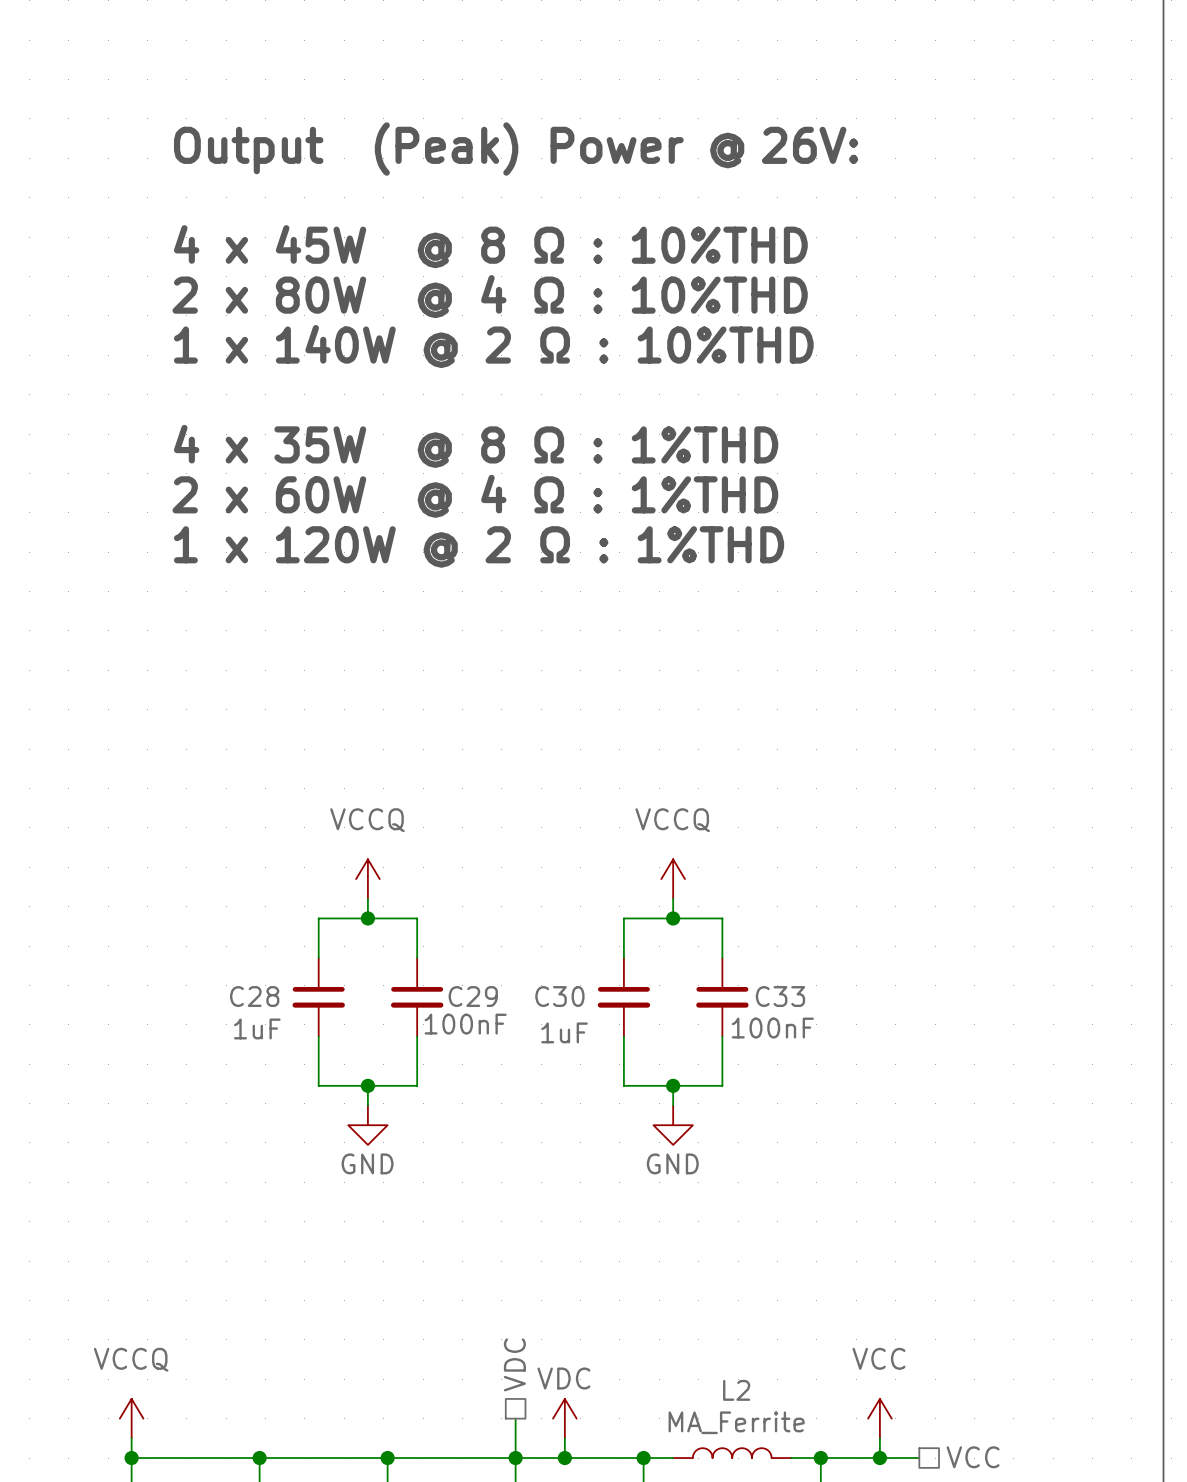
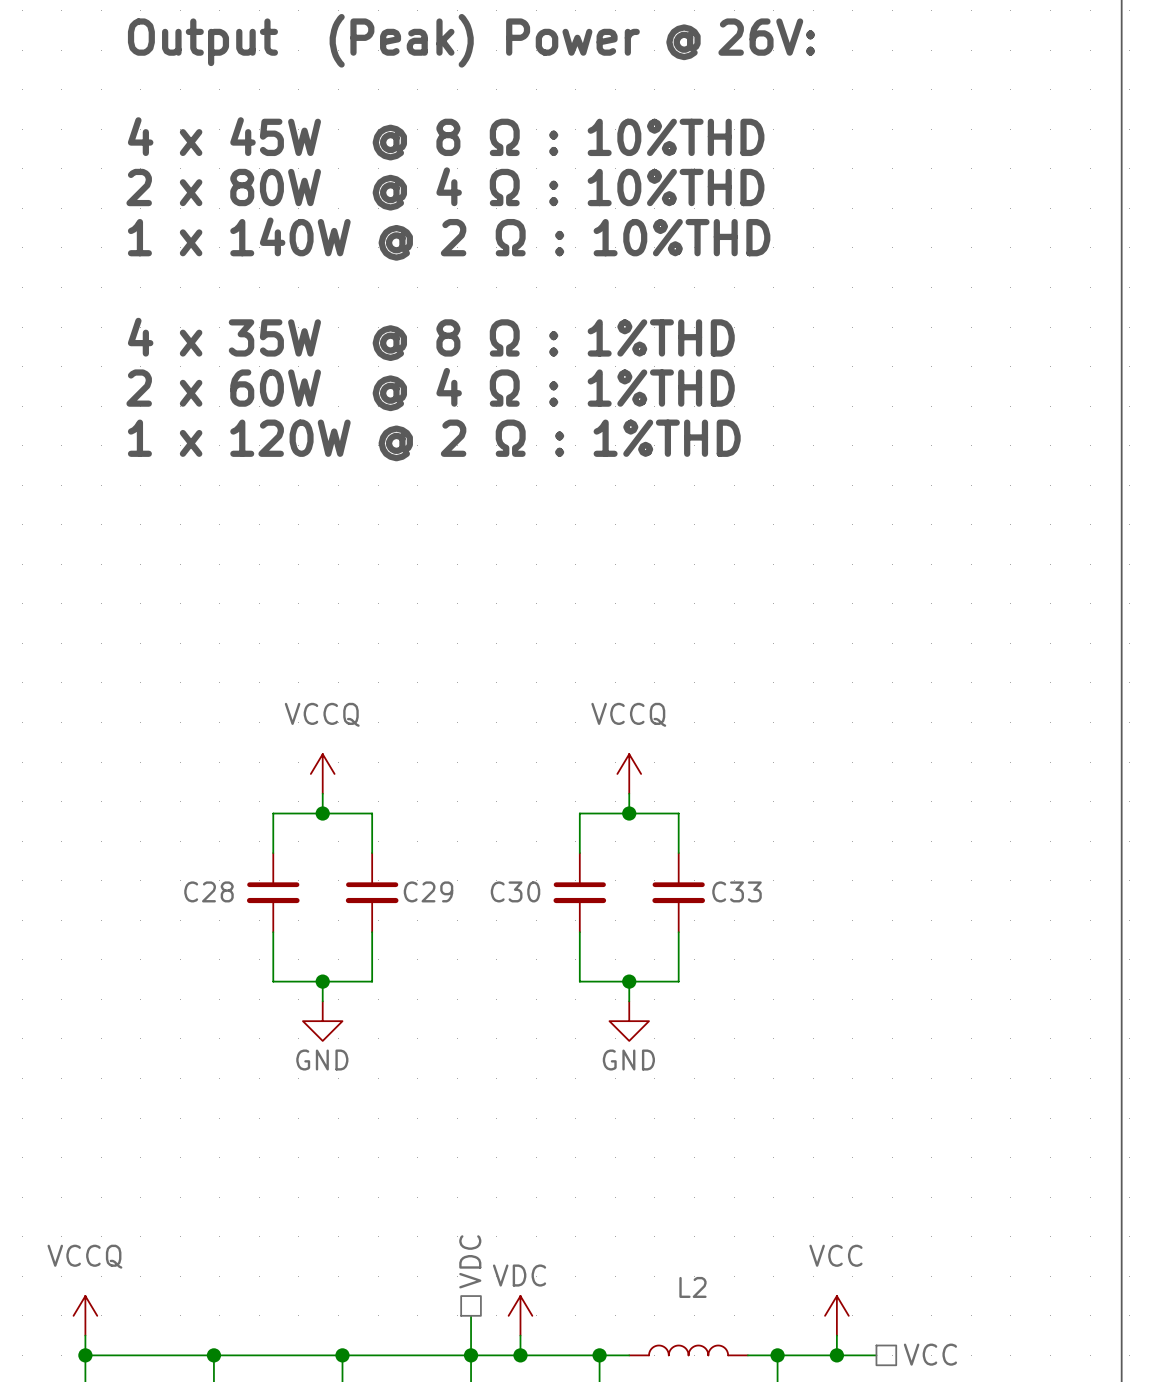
C29 value: 100nF (465, 1024) -> none
C28 value: 1uF (257, 1028) -> none
C33 value: 100nF (772, 1028) -> none
C30 value: 1uF (564, 1032) -> none
L2 value: MA_Ferrite (736, 1422) -> none

